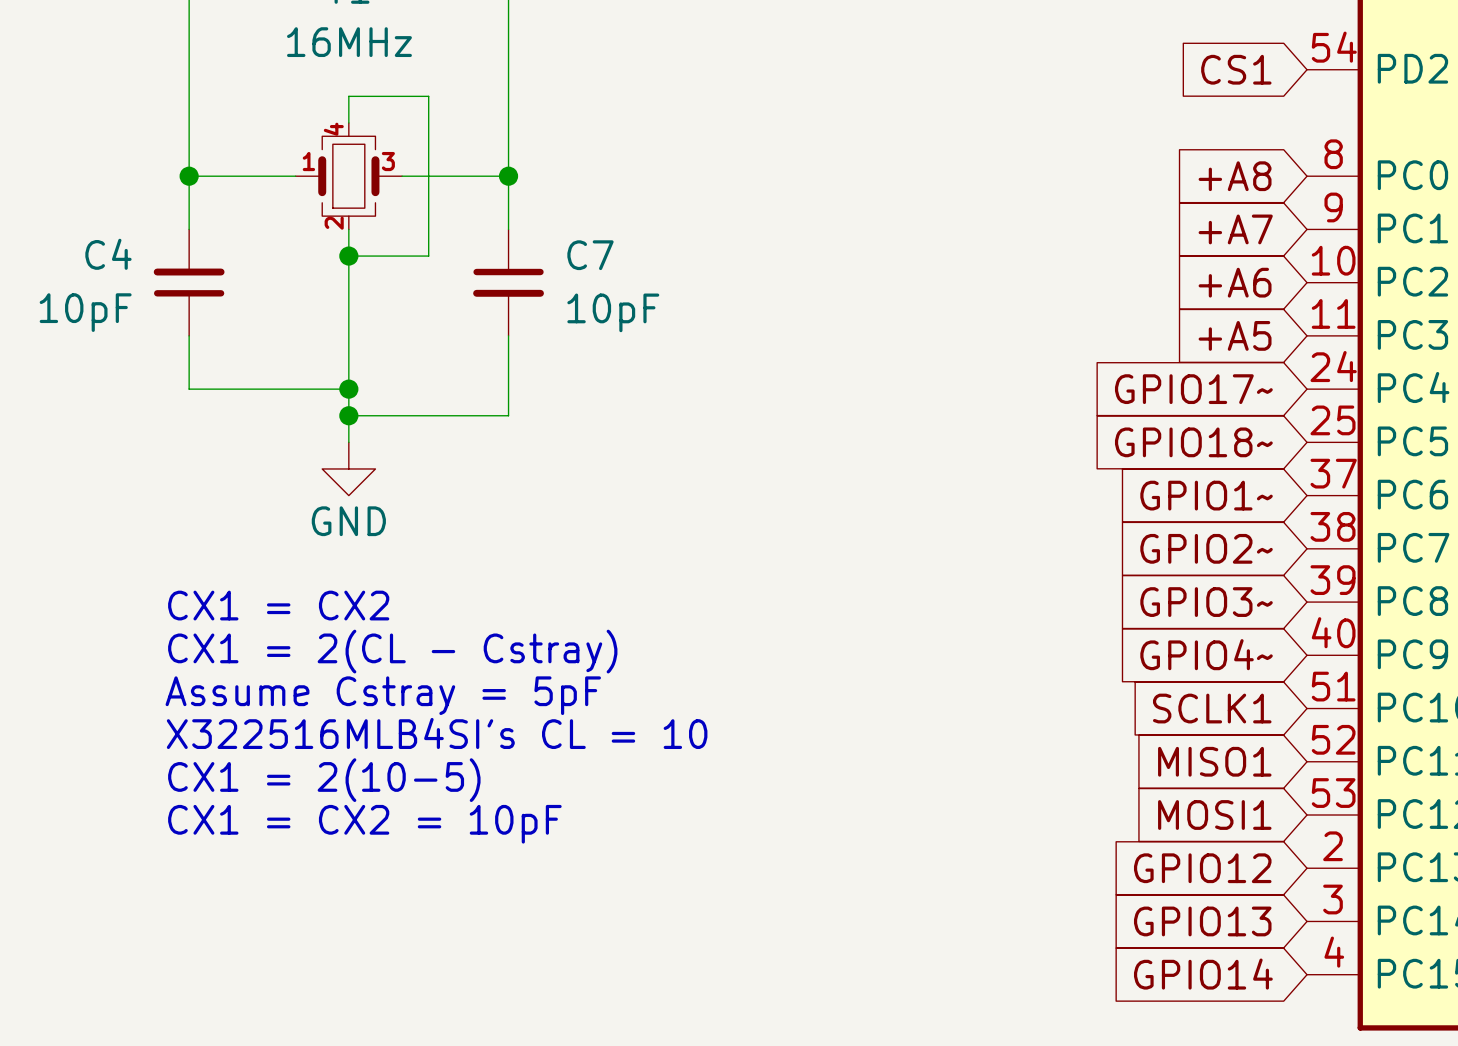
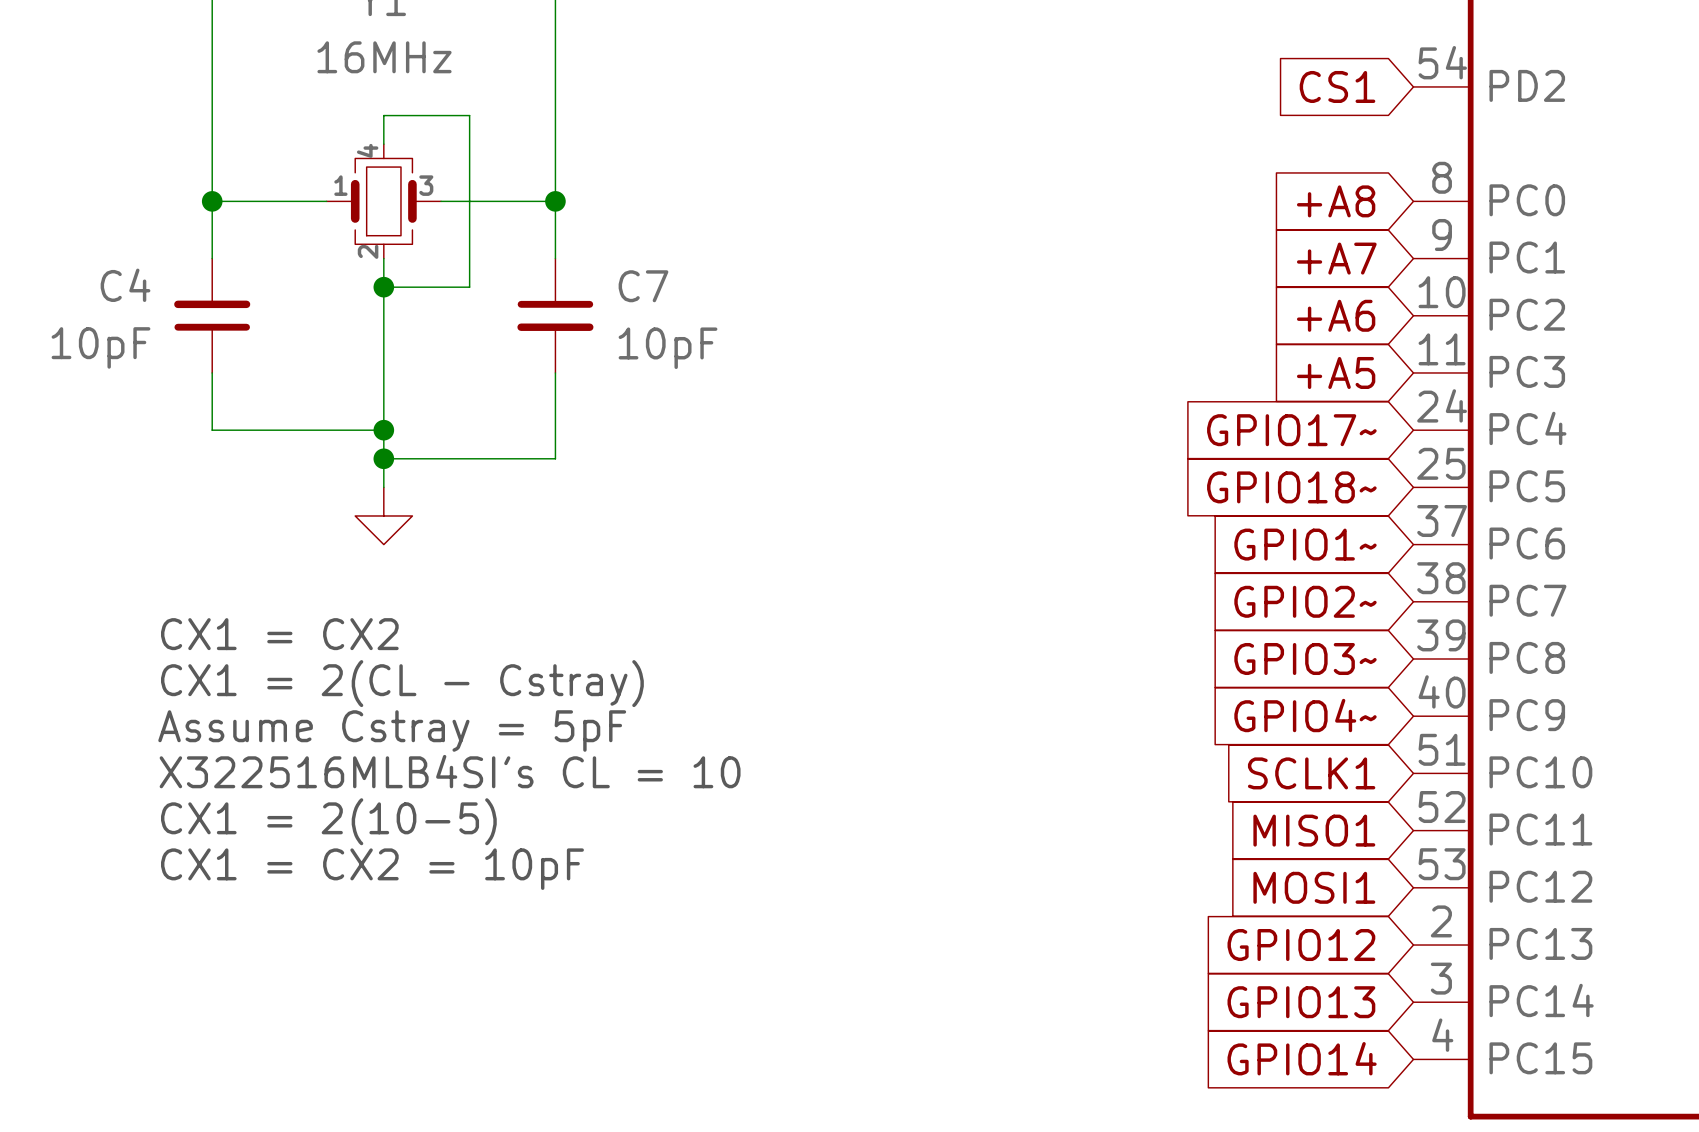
power symbol text: GND (348, 521) -> none
text position: CX1 = CX2 (278, 605) -> CX1 = CX2 (279, 634)
text position: CX1 = 2(CL - Cstray) (392, 651) -> CX1 = 2(CL - Cstray) (402, 683)
text position: Assume Cstray = 5pF (383, 695) -> Assume Cstray = 5pF (392, 731)
text position: X322516MLB4SI's CL = 10 (437, 733) -> X322516MLB4SI's CL = 10 (450, 771)
text position: CX1 = 2(10-5) (324, 780) -> CX1 = 2(10-5) (328, 821)
text position: CX1 = CX2 = 10pF (364, 824) -> CX1 = CX2 = 10pF (372, 869)

